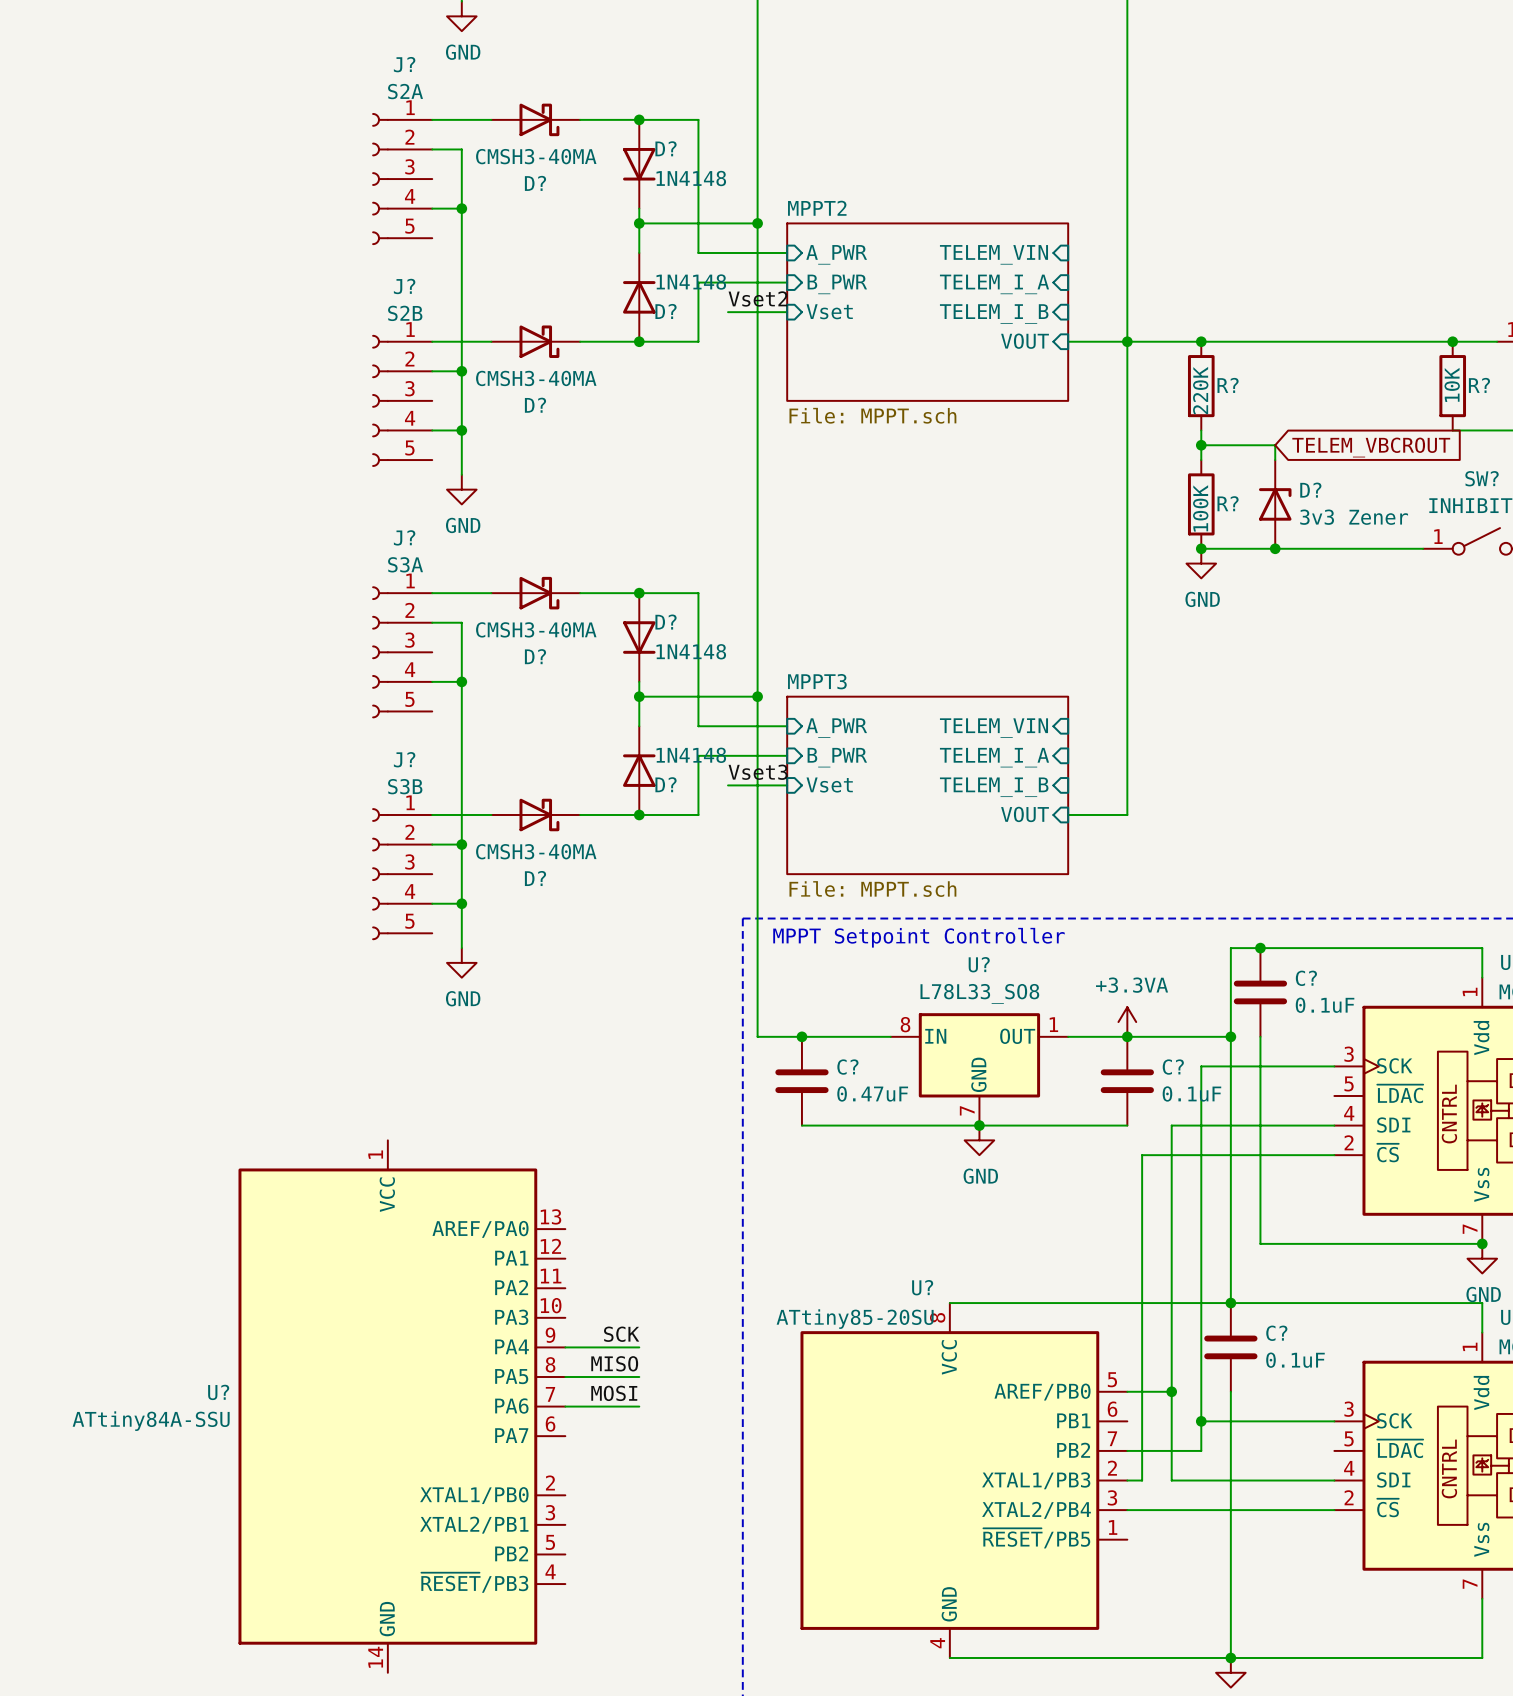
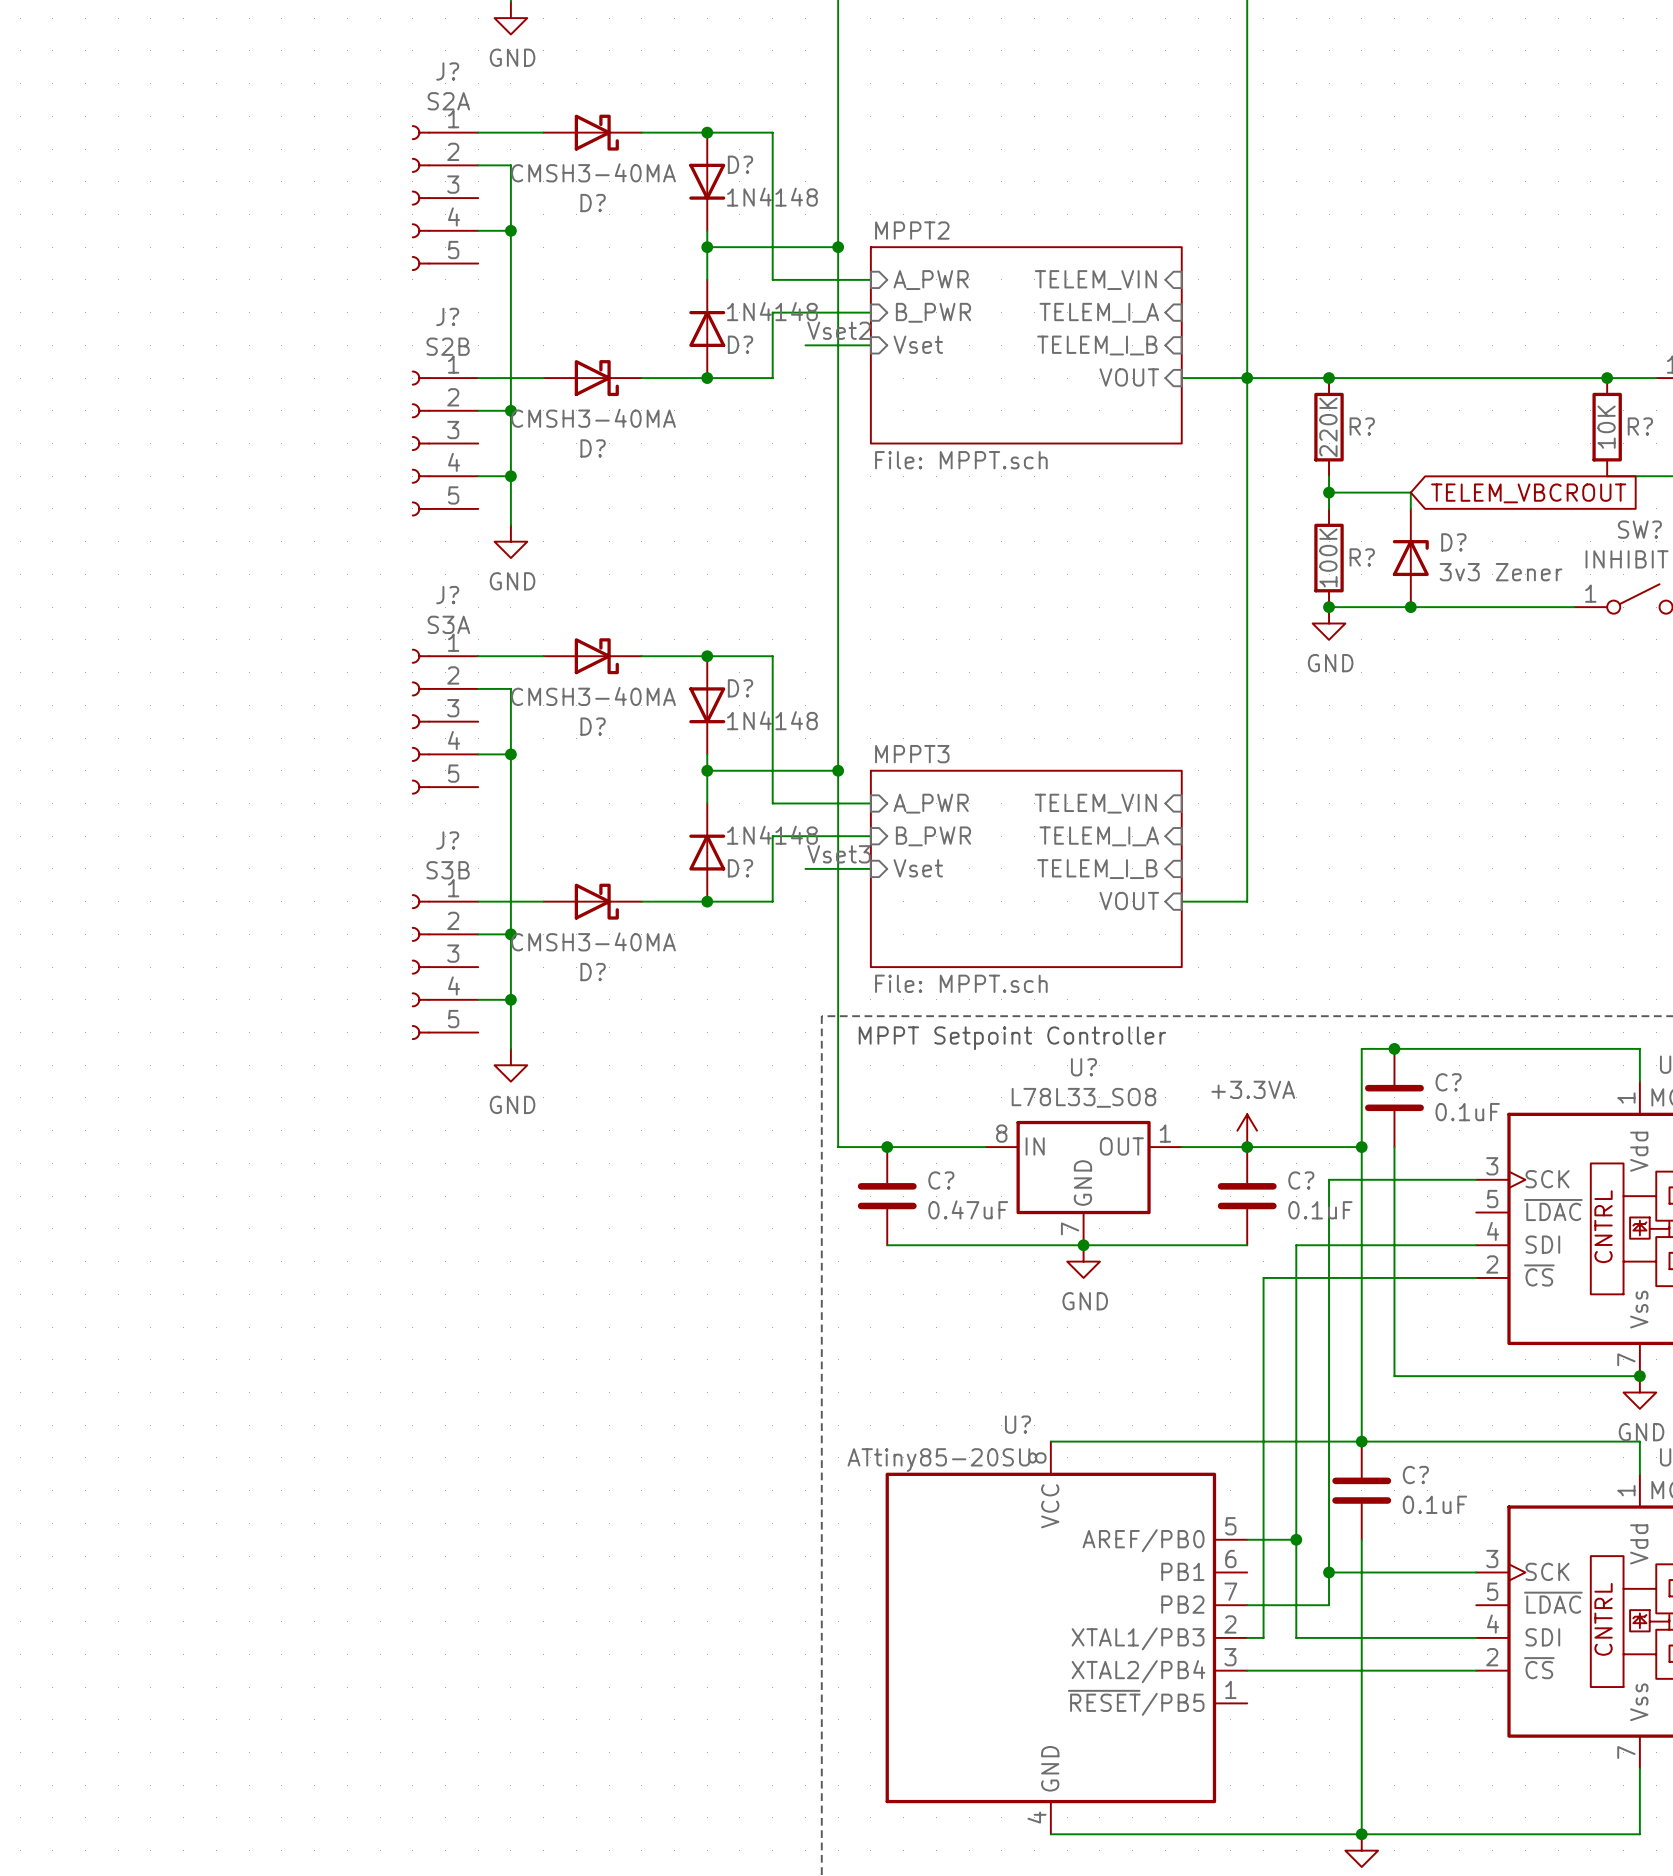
label: SCK (621, 1334) -> none
wire: (565, 1347) (639, 1347) -> none
label: MISO (614, 1363) -> none
wire: (565, 1376) (639, 1376) -> none
label: MOSI (614, 1393) -> none
U?: ATtiny84A-SSU (401, 1406) -> none
wire: (565, 1406) (639, 1406) -> none

